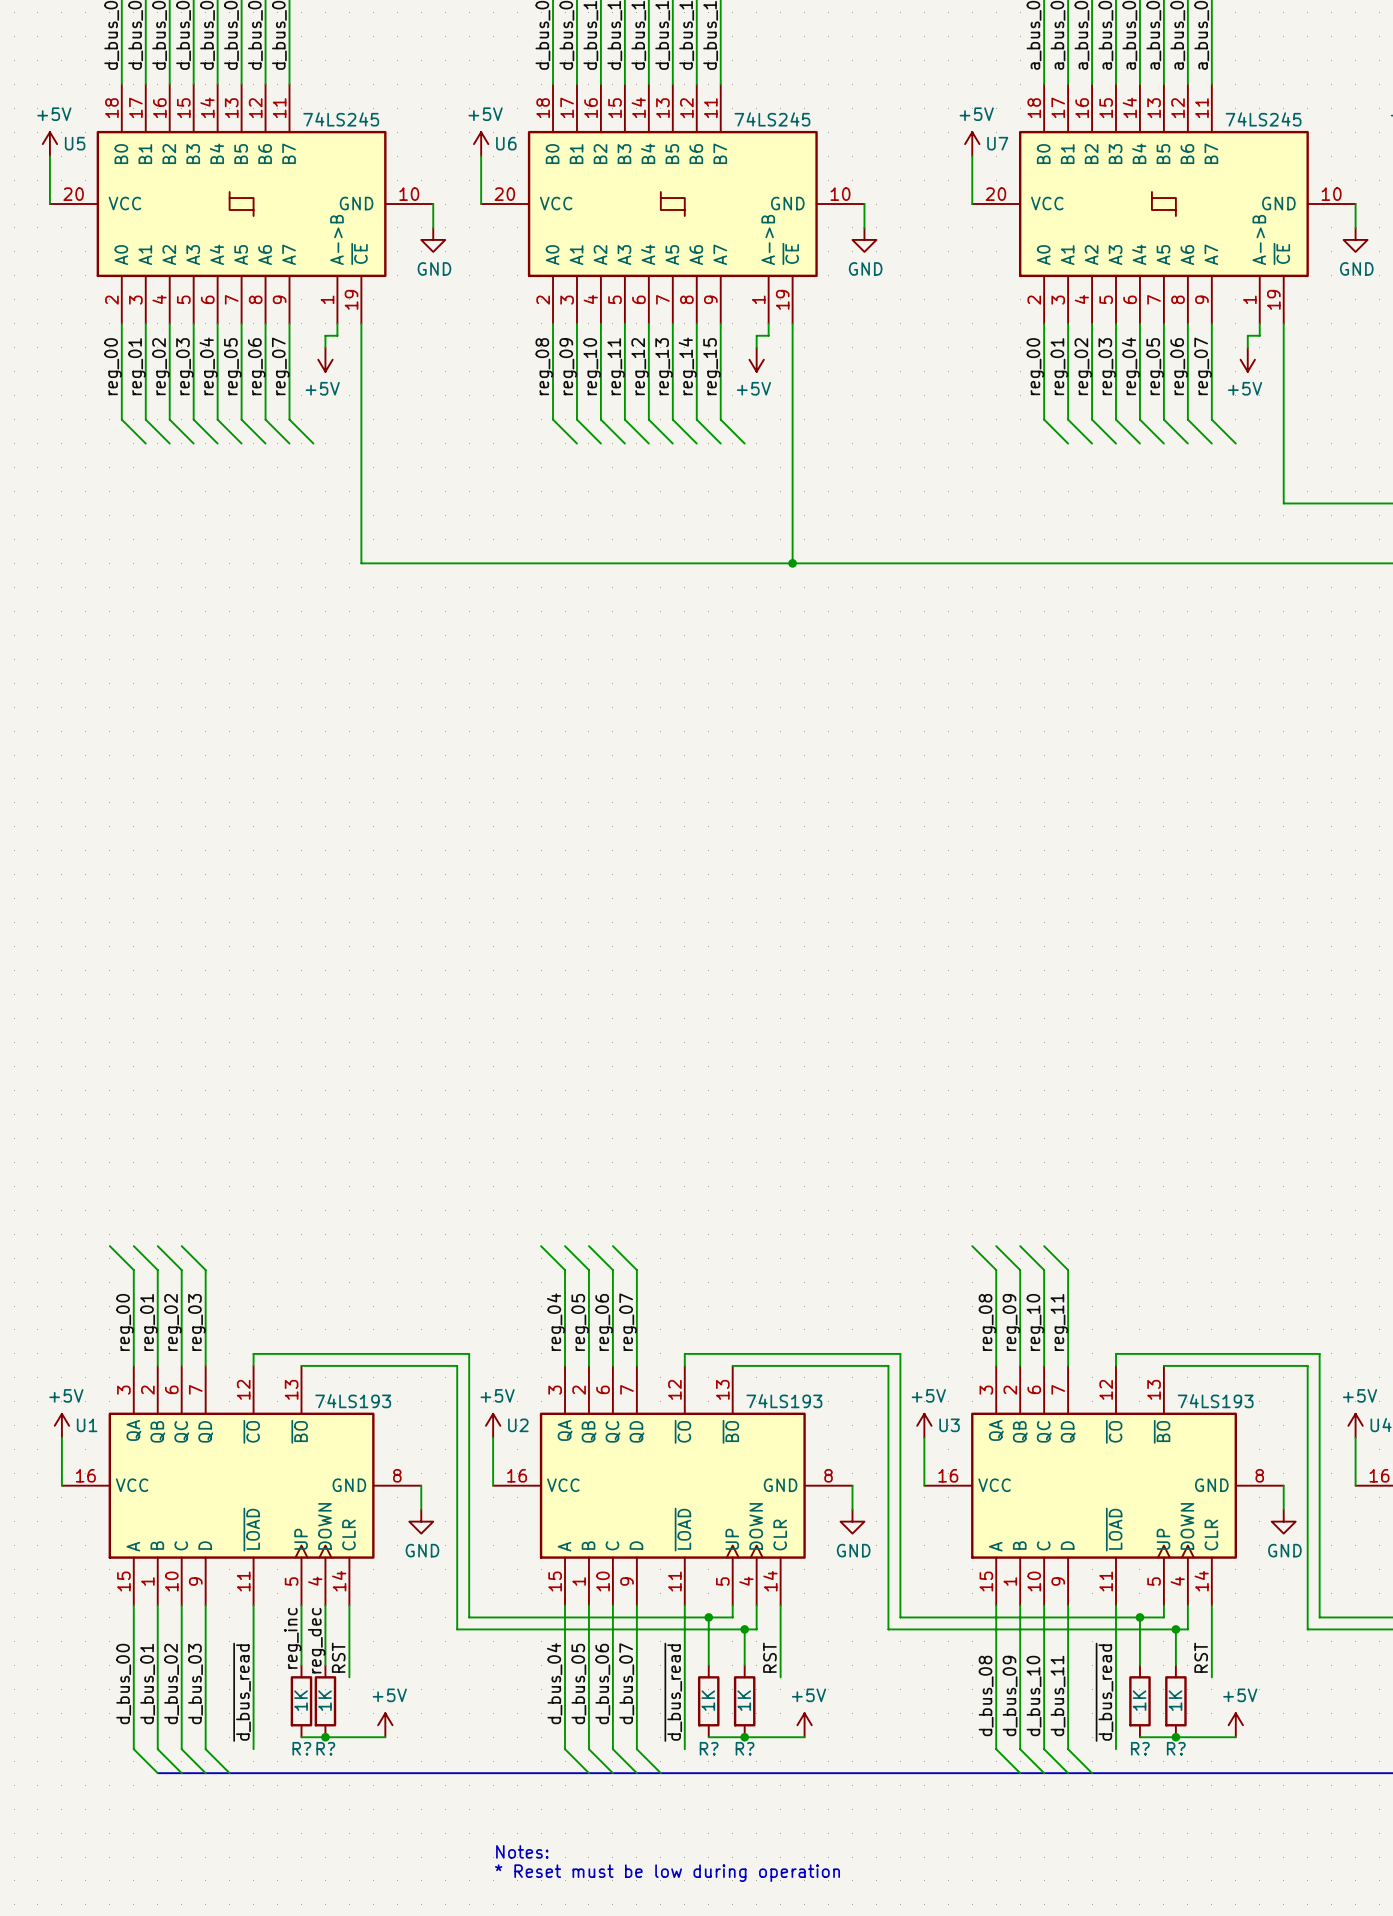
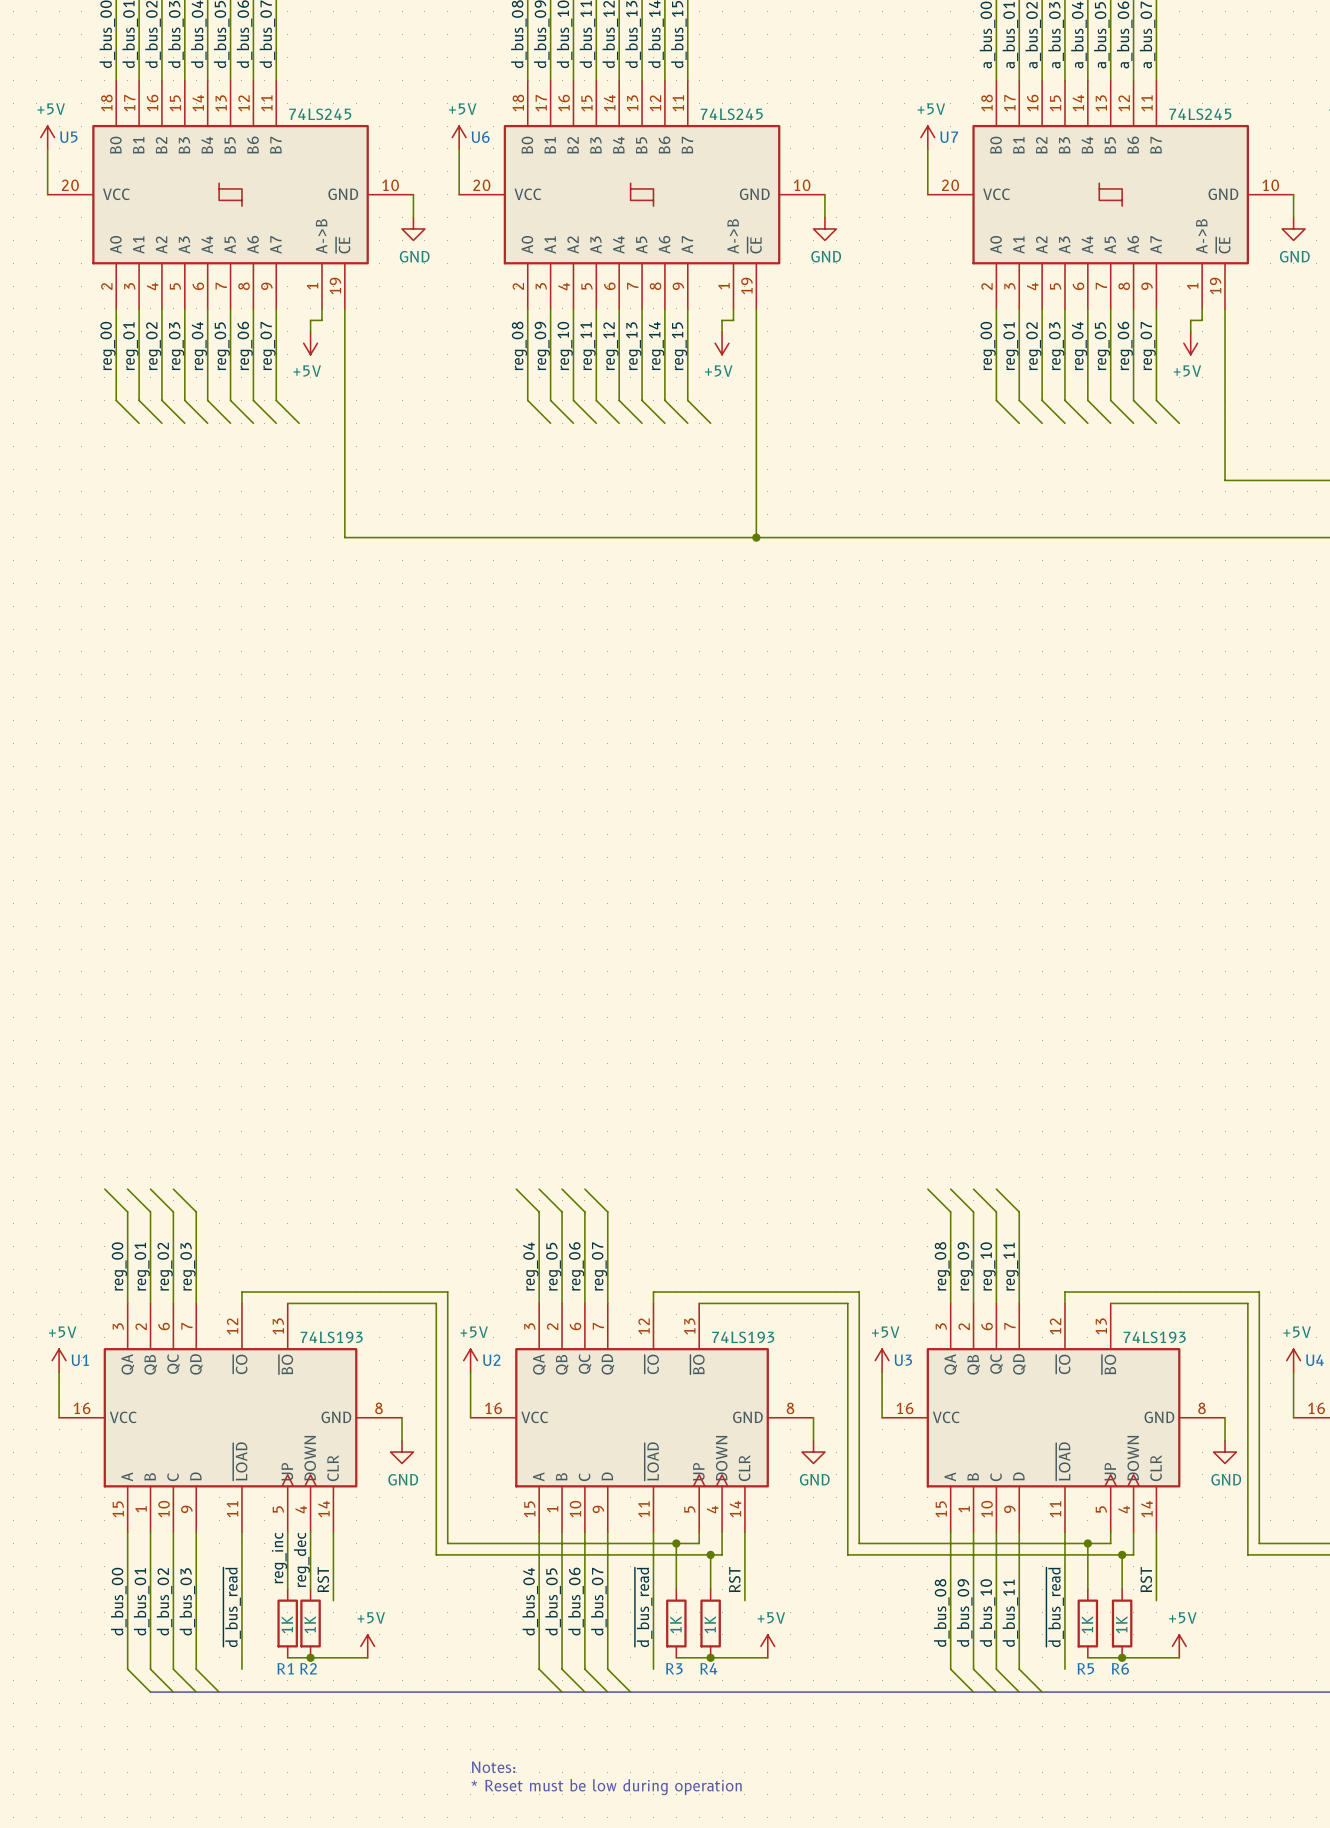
R? name: R? (301, 1748) -> R1 (285, 1668)
R? name: R? (325, 1748) -> R2 (308, 1668)
R? name: R? (709, 1748) -> R3 (674, 1668)
R? name: R? (745, 1748) -> R4 (708, 1668)
R? name: R? (1140, 1748) -> R5 (1085, 1668)
R? name: R? (1176, 1748) -> R6 (1120, 1668)

